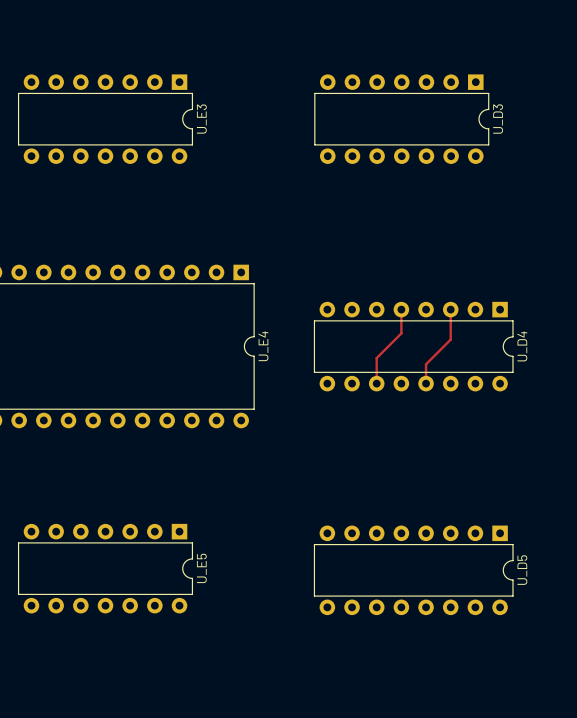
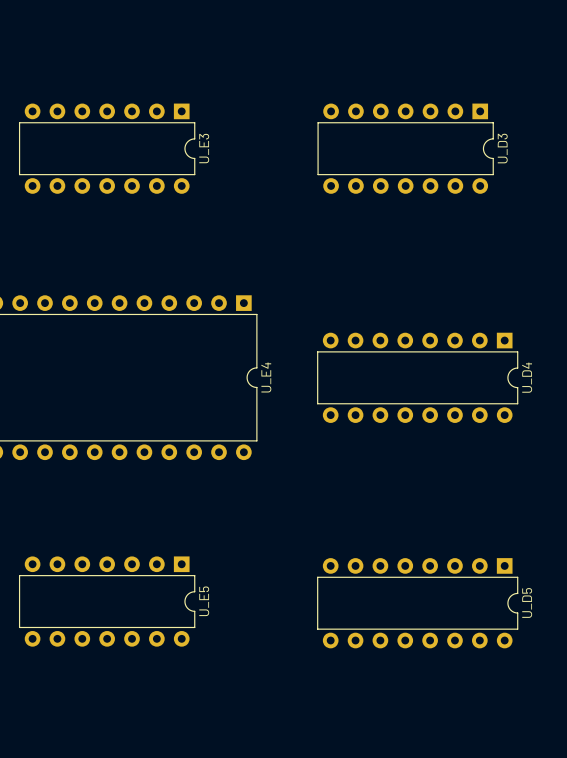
track: (401, 309) (401, 333) (376, 358) (376, 383) -> none
track: (450, 309) (450, 339) (426, 364) (426, 383) -> none

